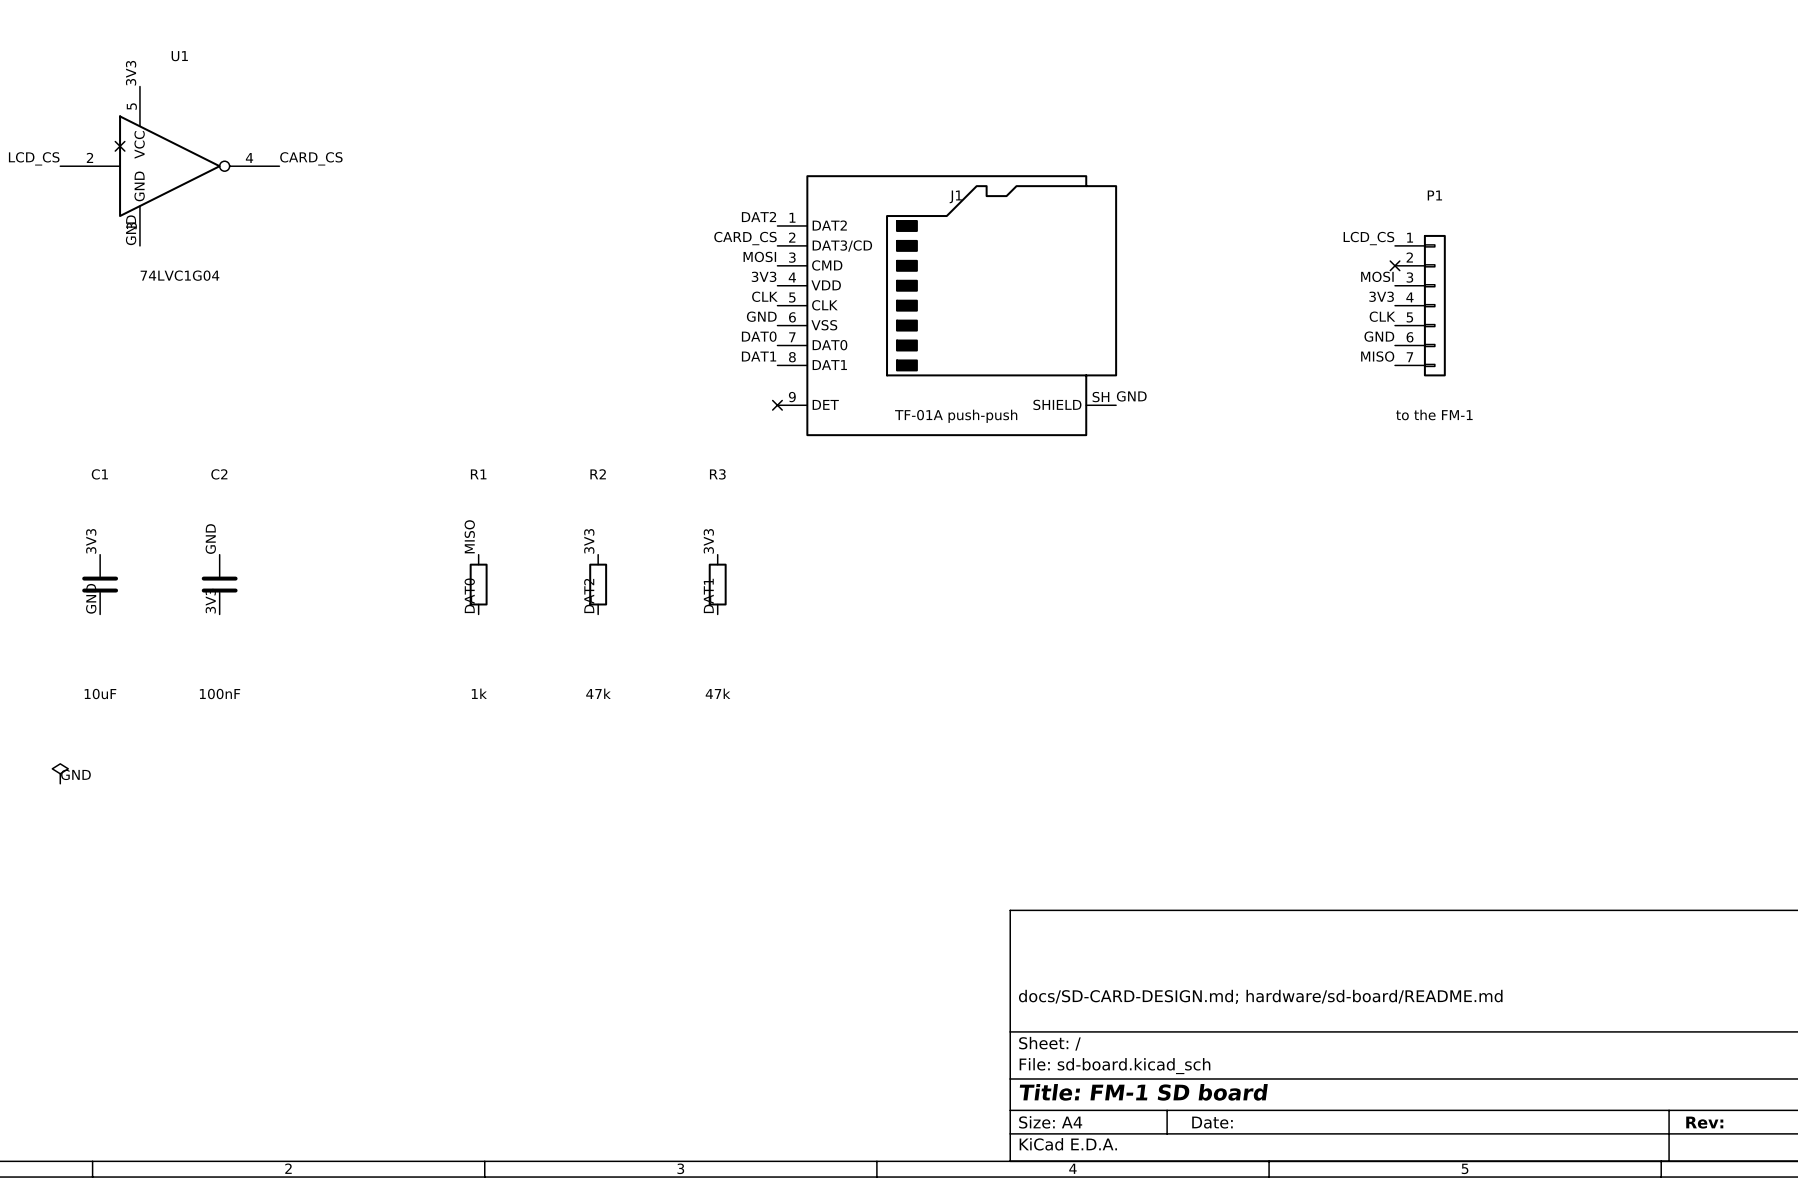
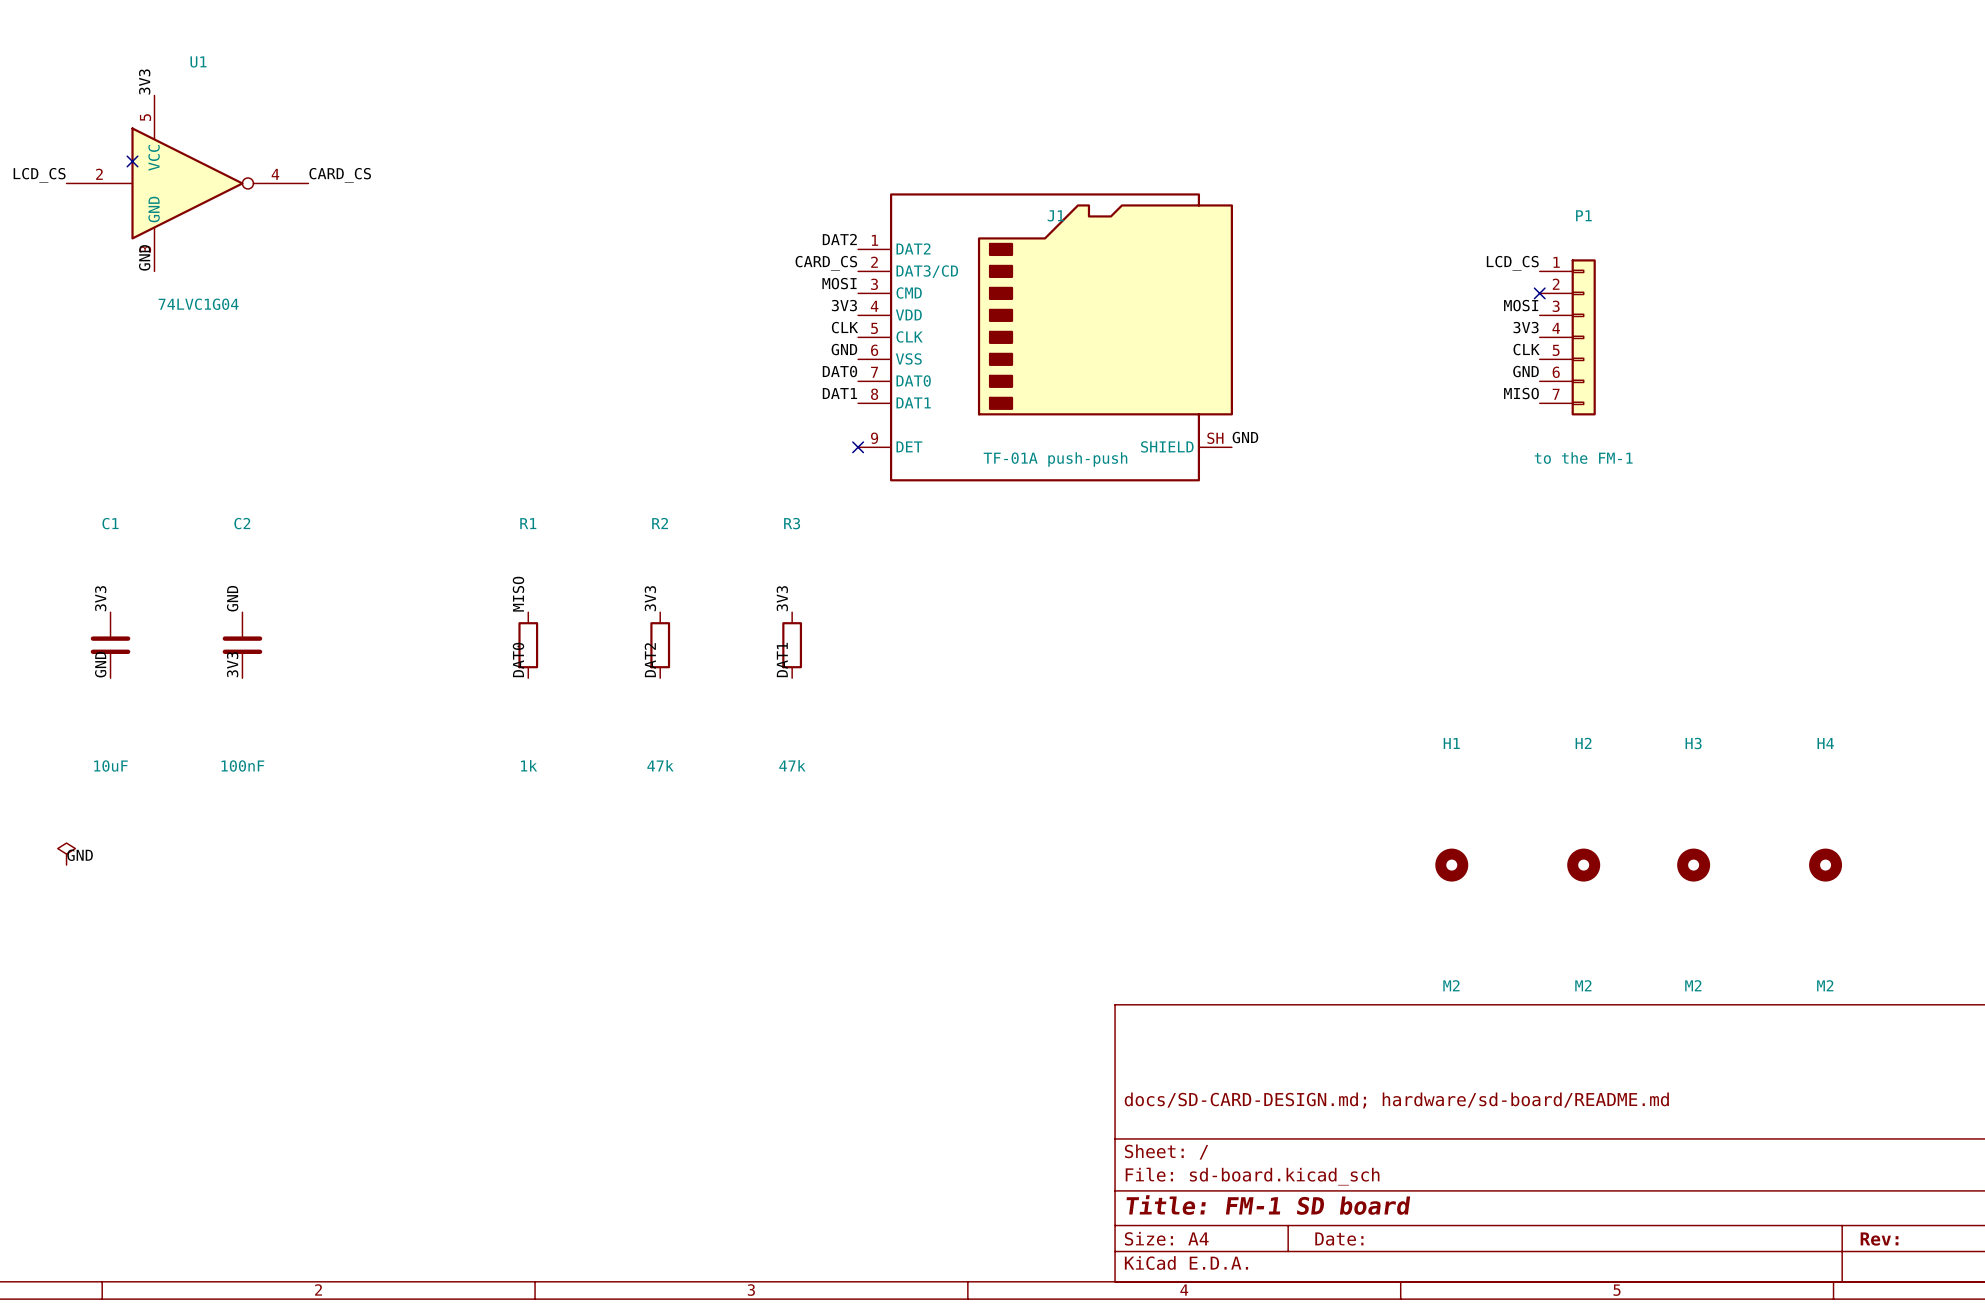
H1: none -> M2 (1451, 865)
H2: none -> M2 (1583, 865)
H3: none -> M2 (1693, 865)
H4: none -> M2 (1825, 865)

